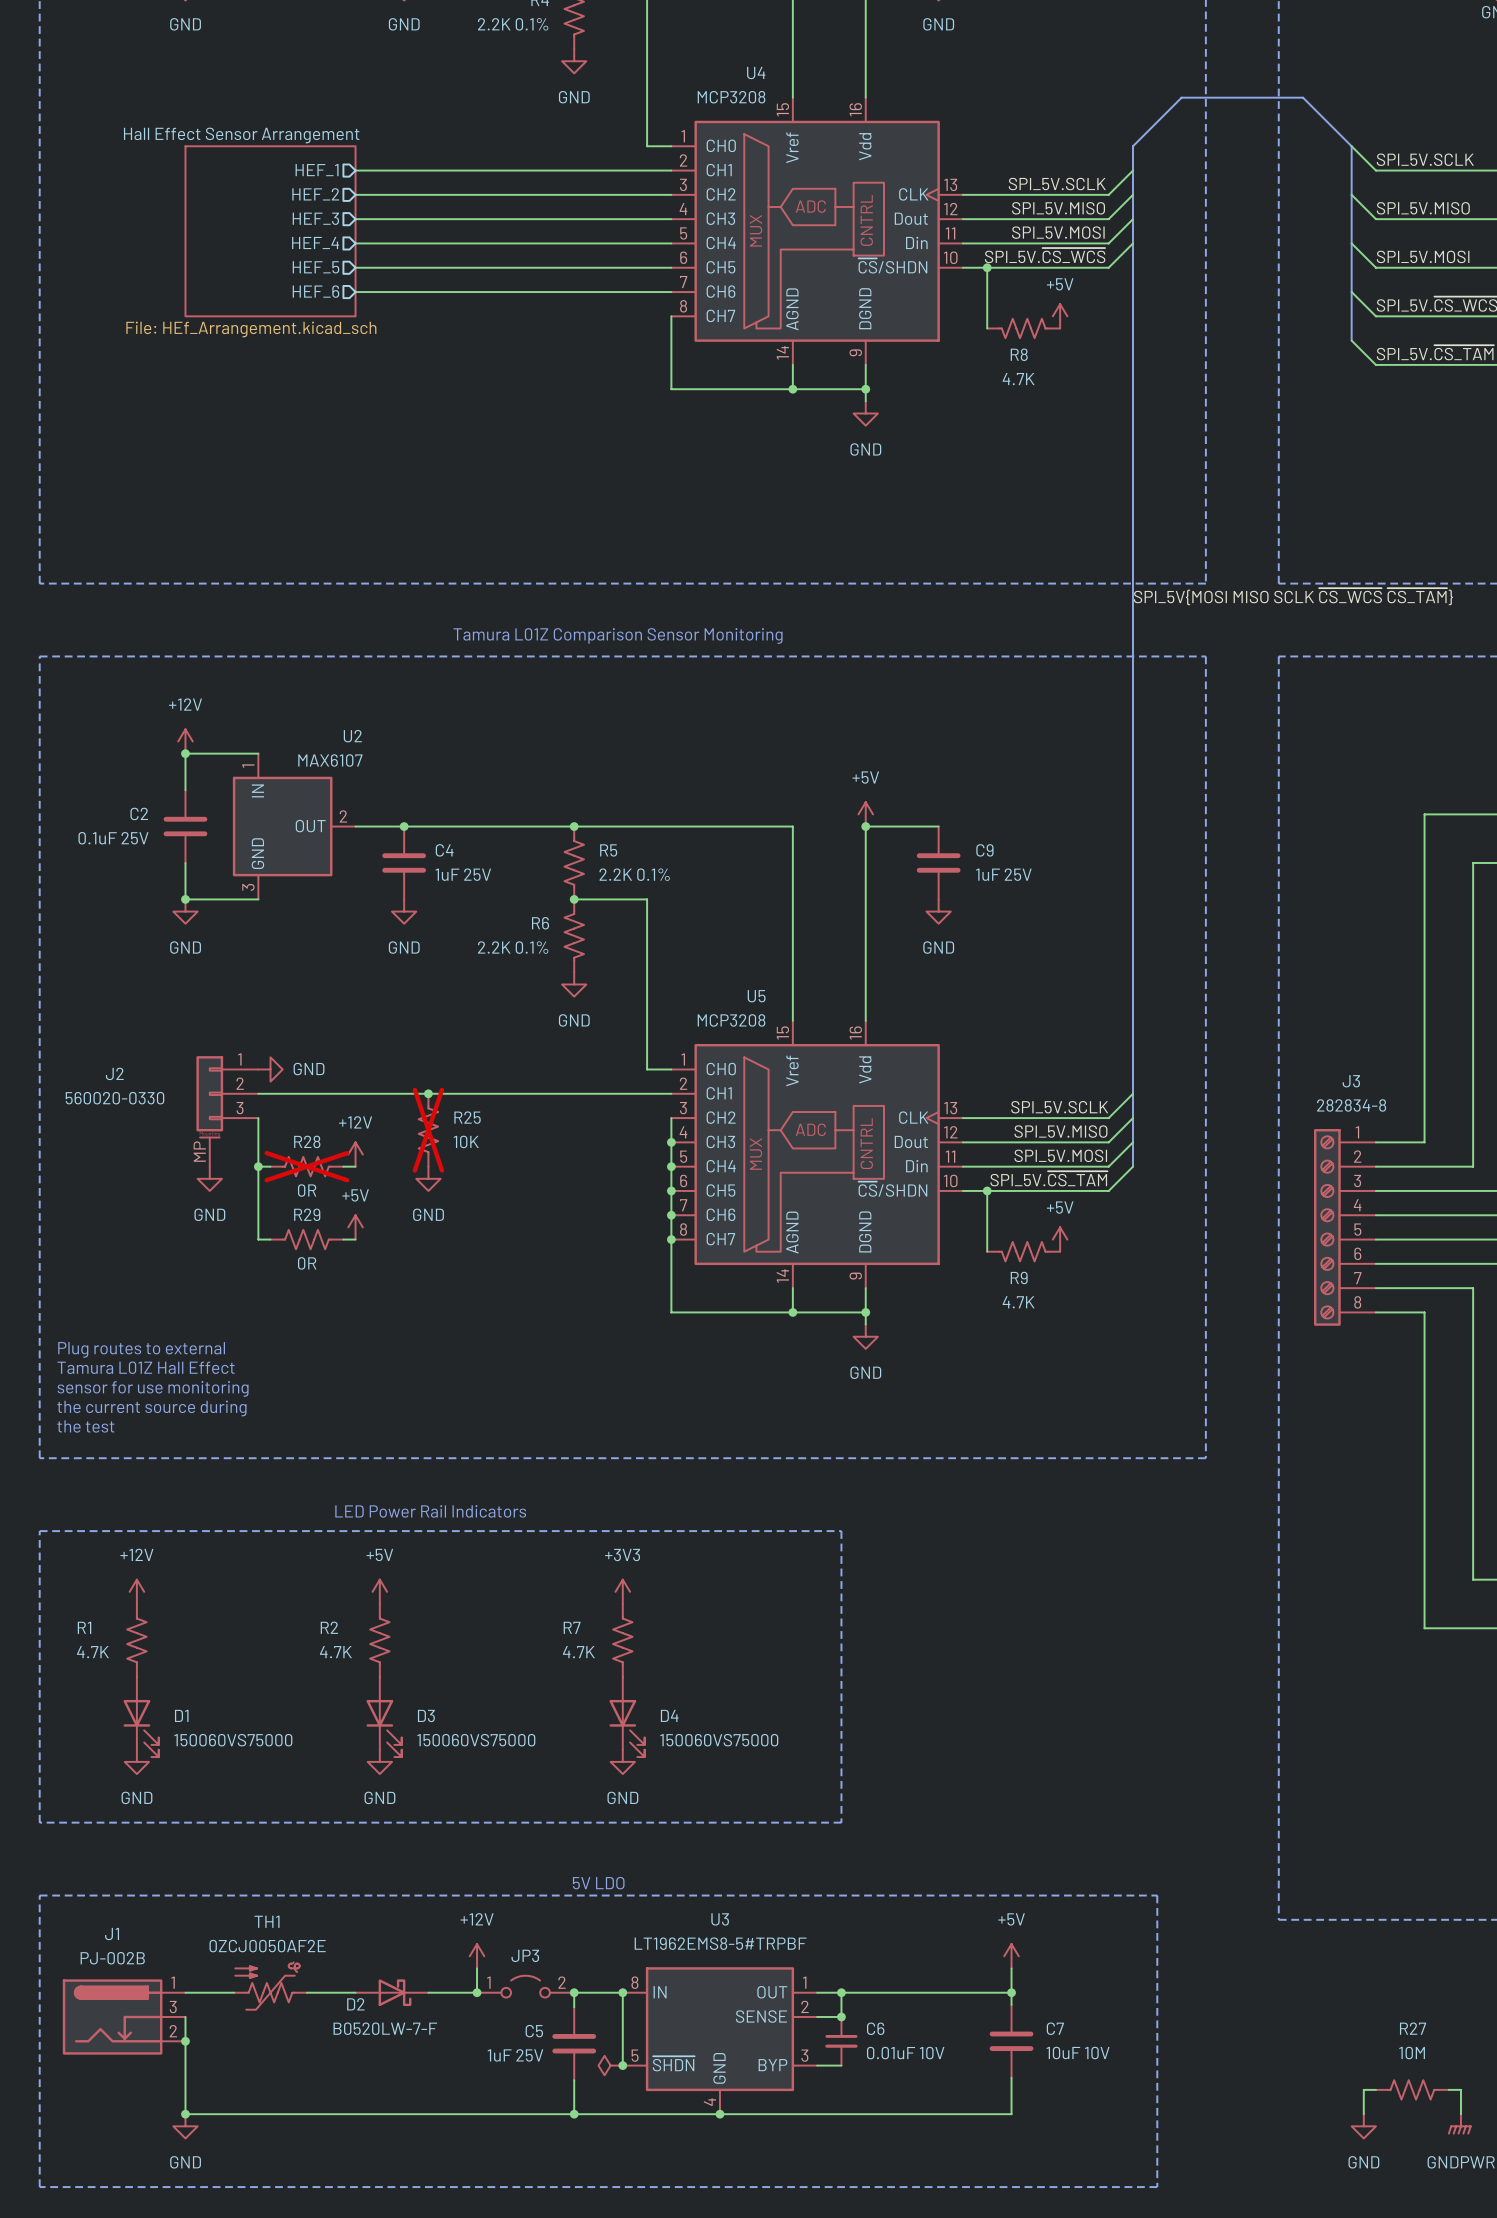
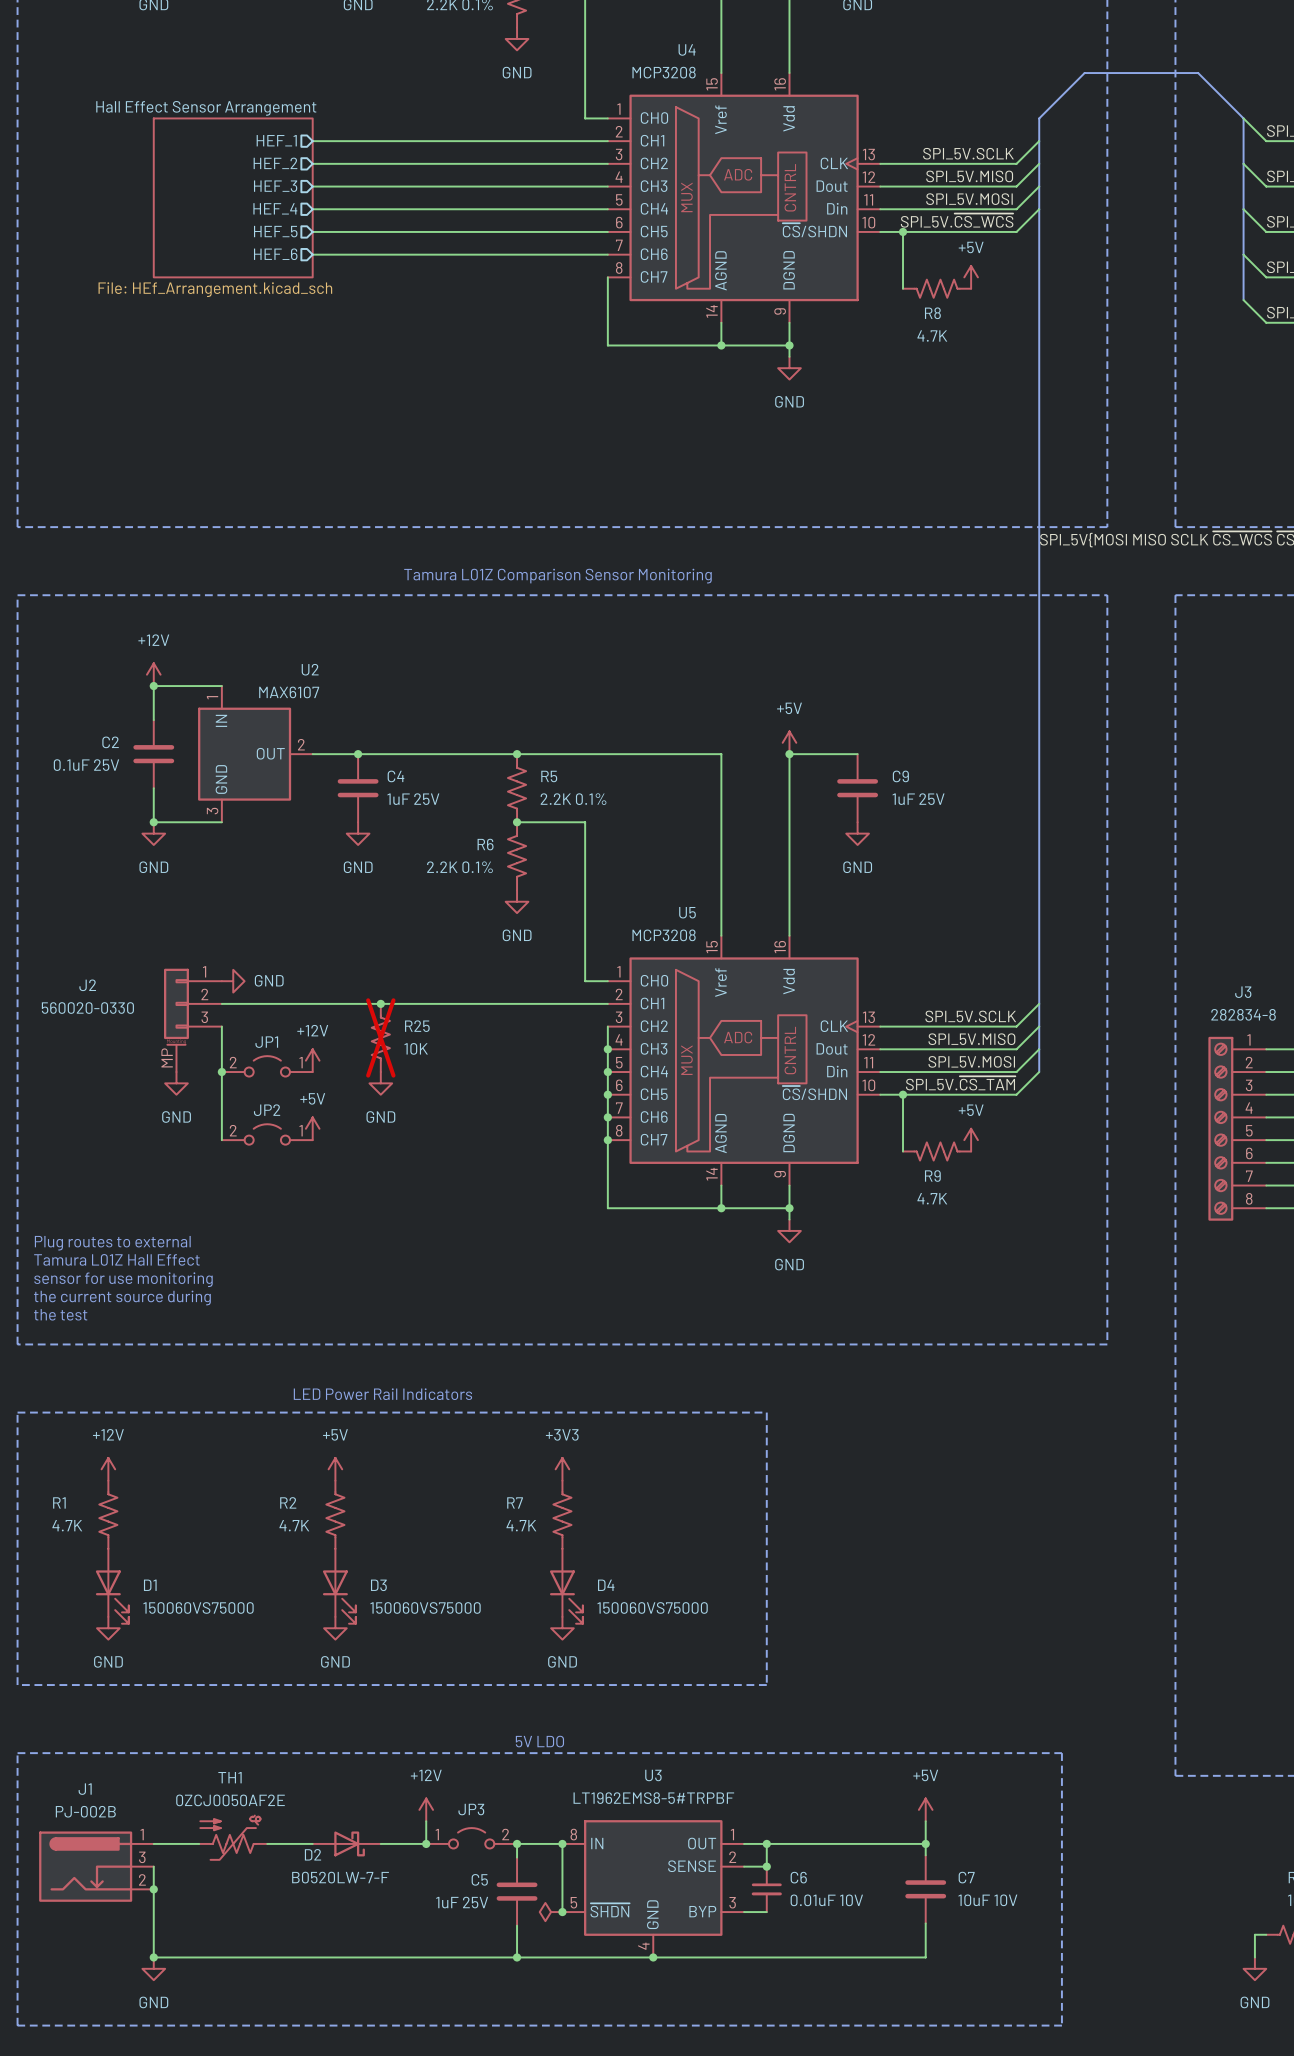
JP1: none -> (267, 1066)
R28: 0R (306, 1166) -> none
JP2: none -> (267, 1134)
R29: 0R (306, 1239) -> none

